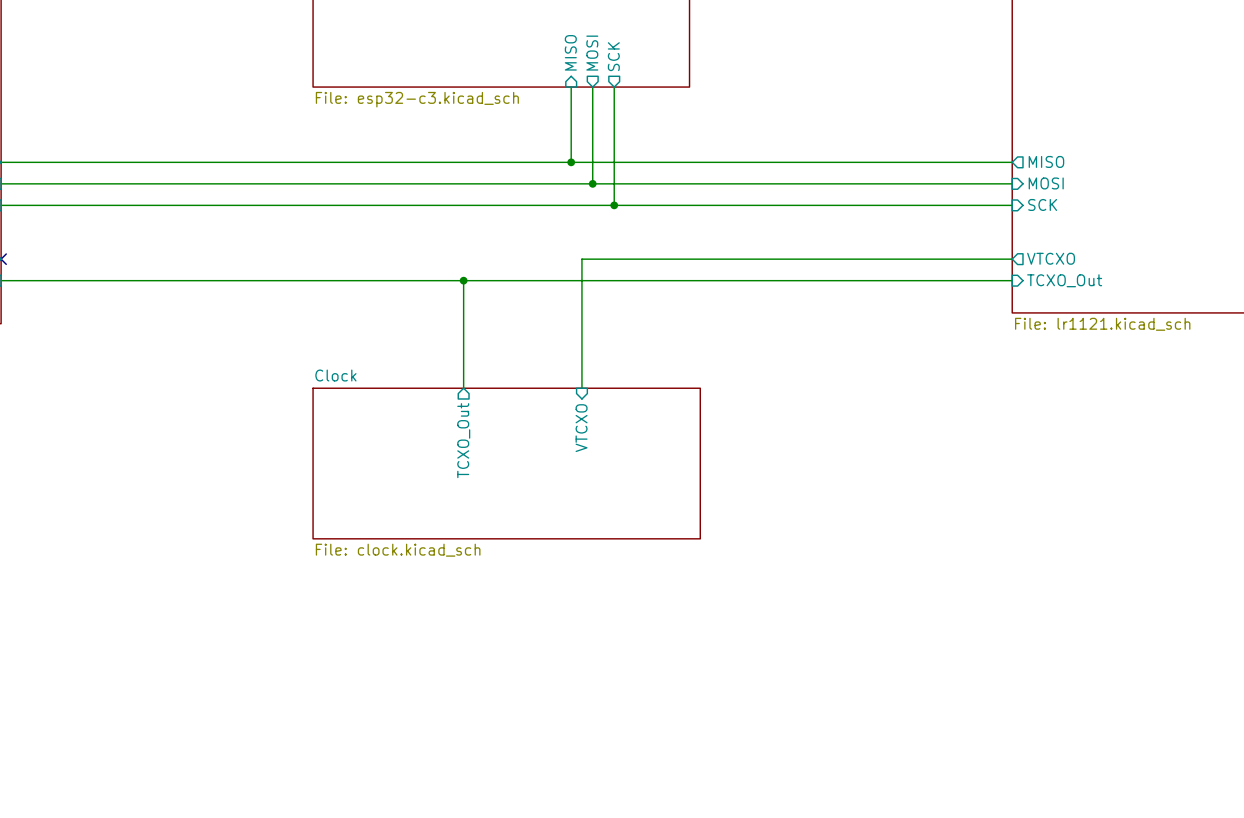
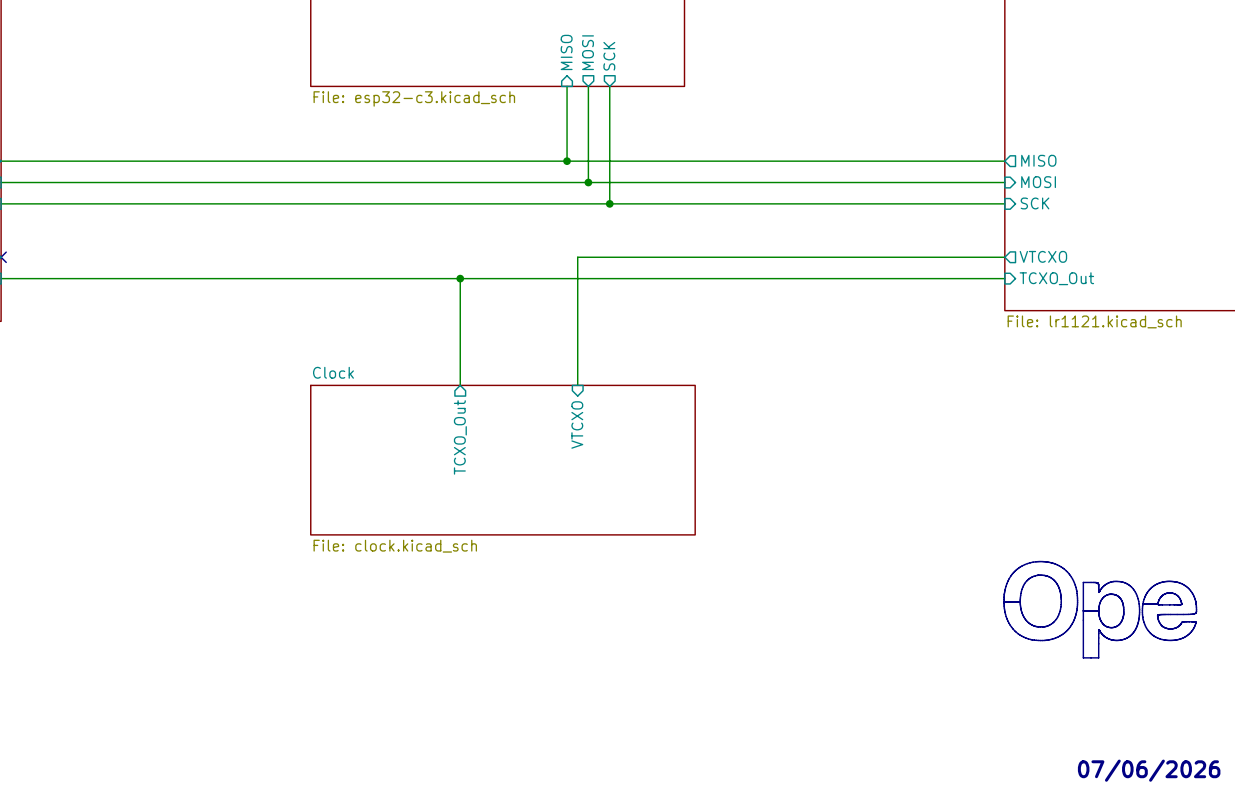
line: none -> (1099, 591) (1111, 582) (1126, 583) (1136, 594) (1139, 609) (1136, 627) (1126, 638) (1110, 639) (1104, 636) (1099, 630)
line: none -> (1098, 591) (1097, 583) (1083, 582) (1083, 657) (1098, 657) (1098, 629)
line: none -> (1004, 601) (1007, 619) (1016, 632) (1028, 638) (1046, 640) (1061, 635) (1071, 625) (1076, 610) (1077, 593) (1072, 578) (1064, 569) (1051, 562) (1035, 561) (1022, 565) (1012, 574) (1005, 586) (1004, 601)
line: none -> (1004, 601) (1020, 601)
line: none -> (1020, 601) (1022, 613) (1027, 622) (1035, 626) (1047, 626) (1054, 621) (1059, 613) (1061, 602) (1059, 589) (1050, 577) (1035, 575) (1024, 584) (1020, 601)
line: none -> (1142, 603) (1142, 616) (1145, 626) (1151, 634) (1160, 638) (1171, 640) (1182, 638) (1191, 631) (1195, 623)
line: none -> (1142, 603) (1157, 603)
line: none -> (1142, 603) (1149, 590) (1162, 582) (1178, 582) (1191, 591) (1195, 602) (1195, 613) (1158, 614)
line: none -> (1157, 604) (1181, 604)
line: none -> (1181, 603) (1177, 595) (1169, 592) (1161, 596) (1157, 603)
line: none -> (1083, 610) (1098, 610)
line: none -> (1098, 610) (1103, 624) (1108, 627) (1115, 627) (1122, 618) (1122, 602) (1116, 595) (1107, 594) (1101, 600) (1098, 610)
line: none -> (1157, 615) (1160, 624) (1168, 628) (1176, 627) (1182, 622) (1195, 622)
text: none -> 07/06/2026 (1149, 770)

